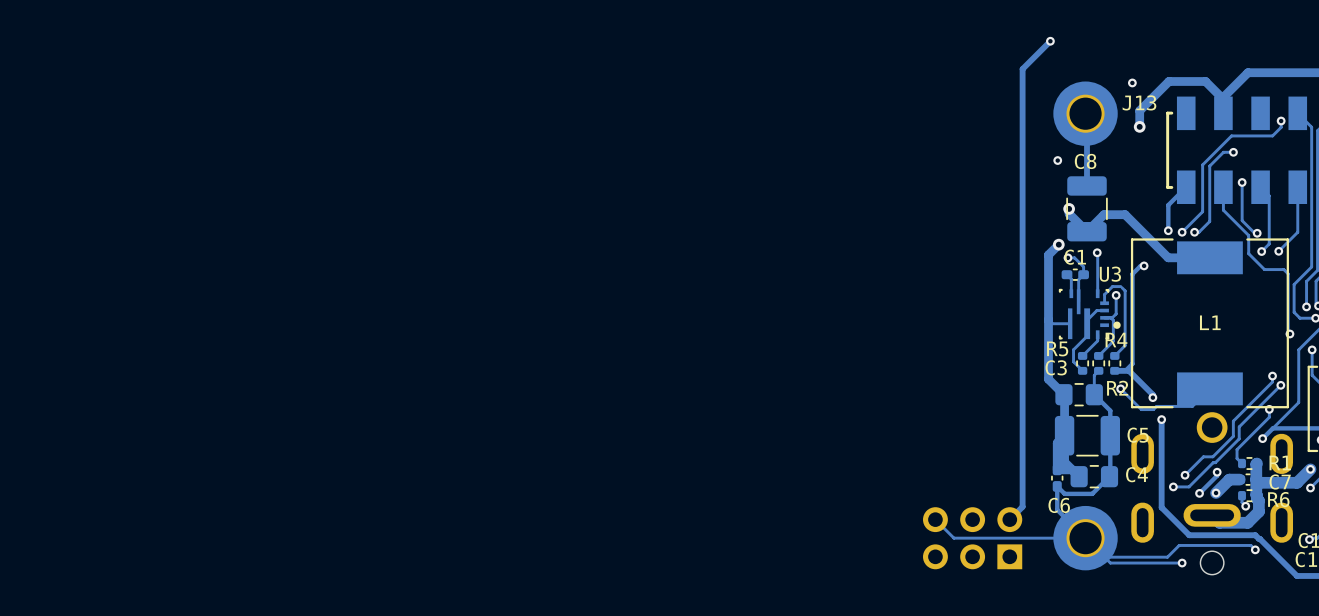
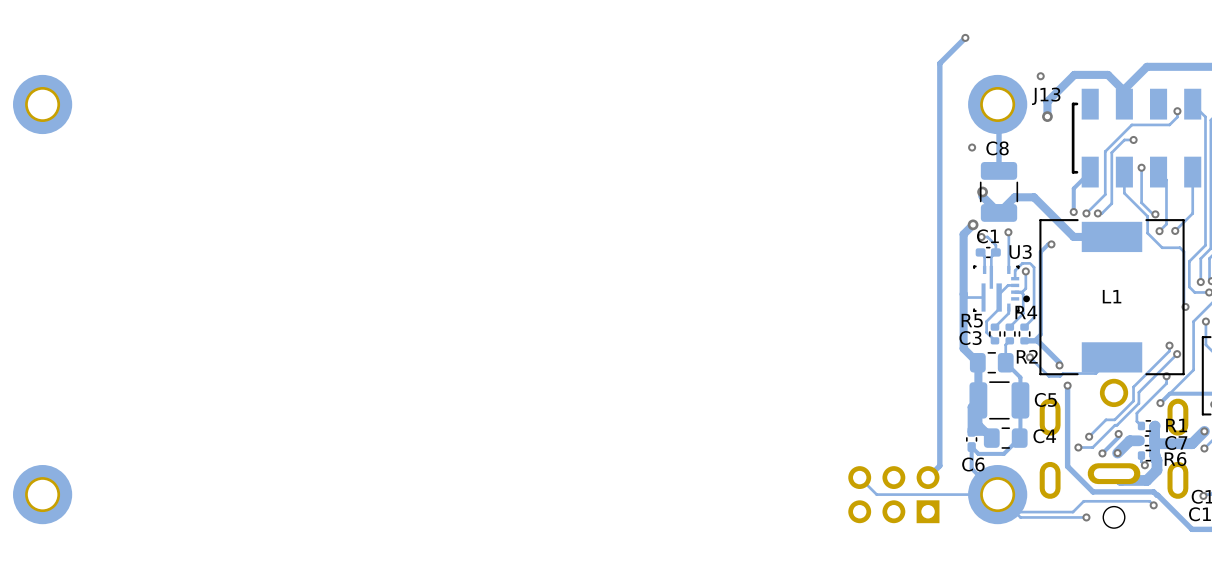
part: none -> (42, 104)
part: none -> (42, 494)

